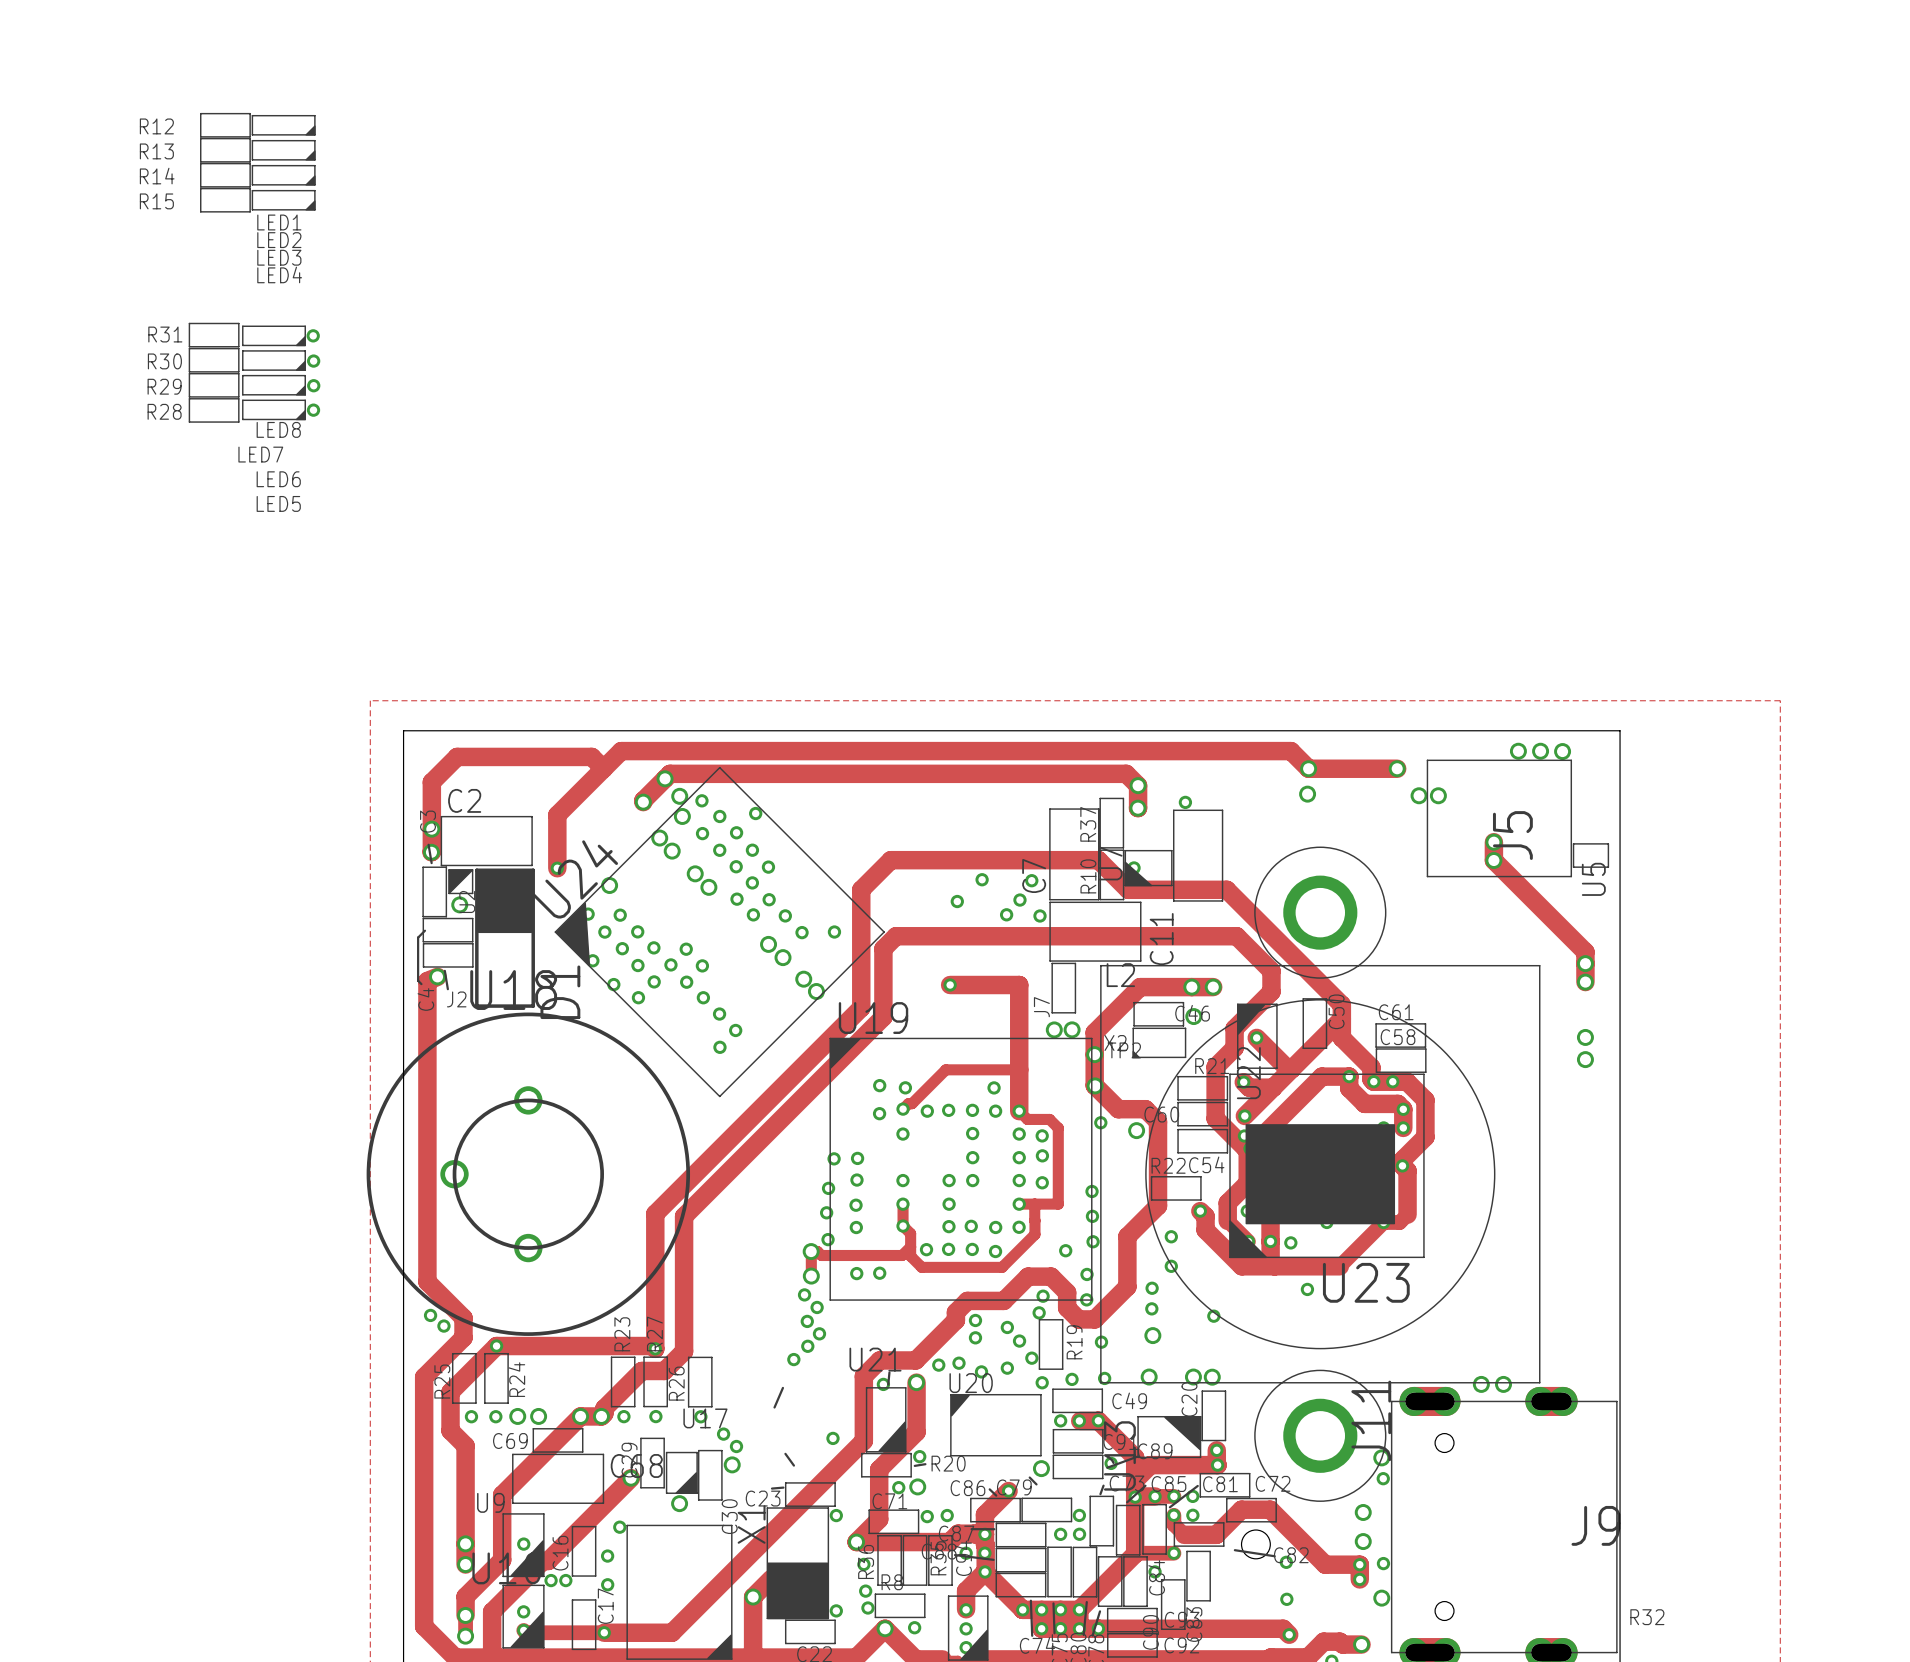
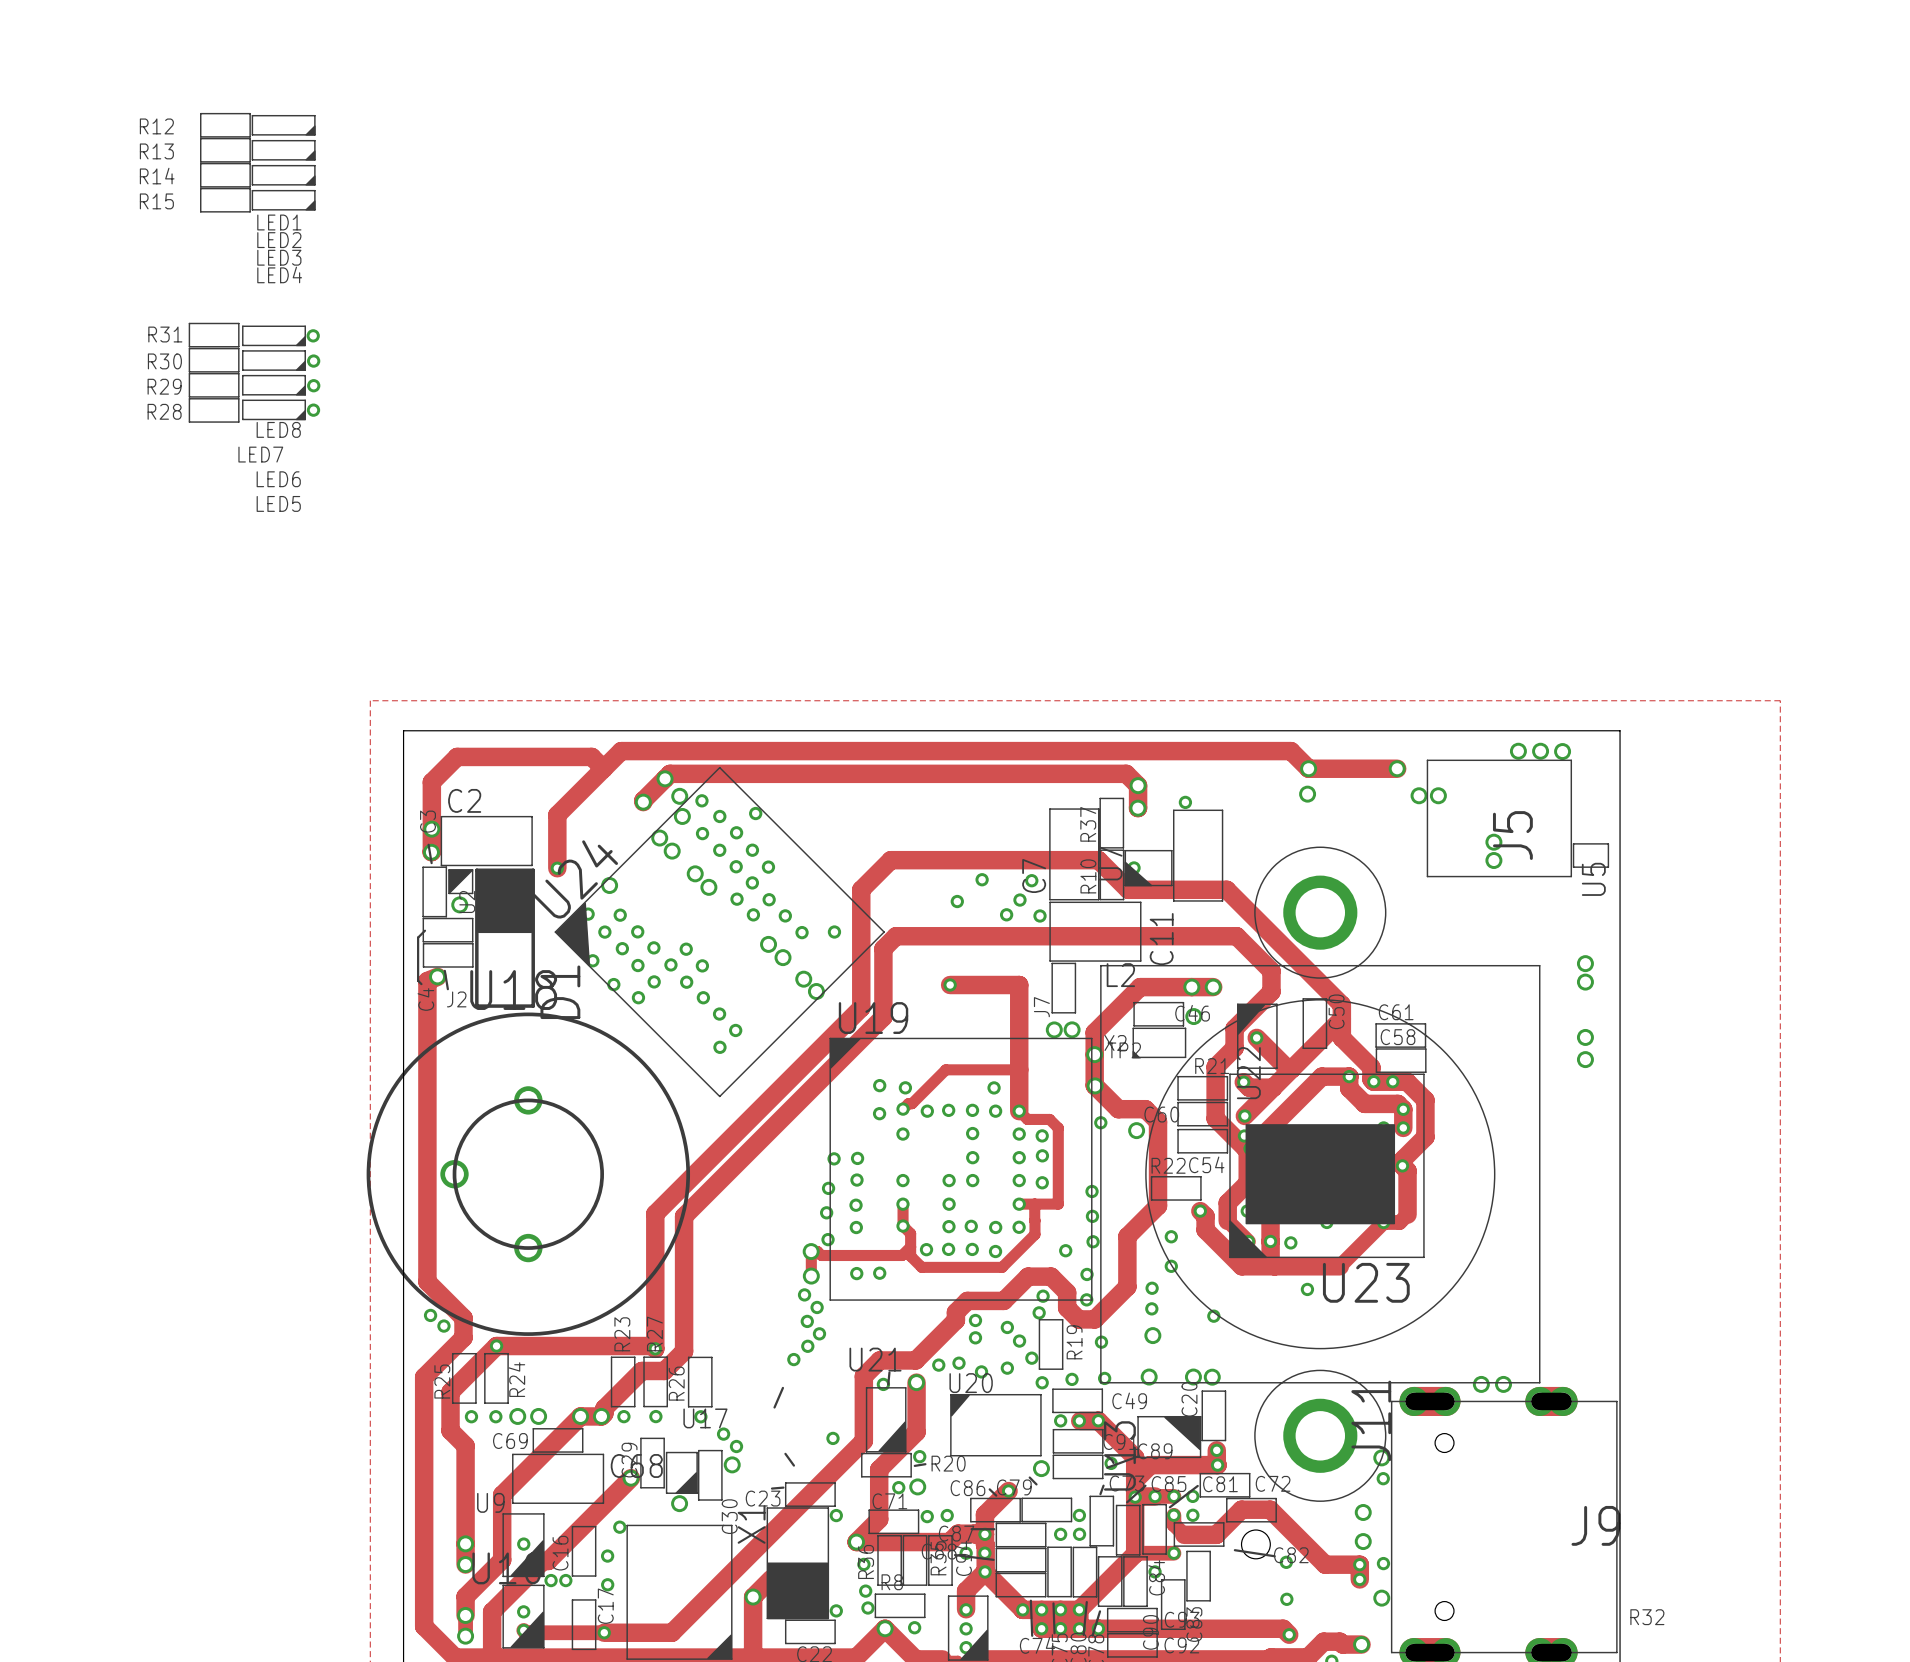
track: (1493, 842) (1493, 860) (1585, 952) (1585, 982) -> none

